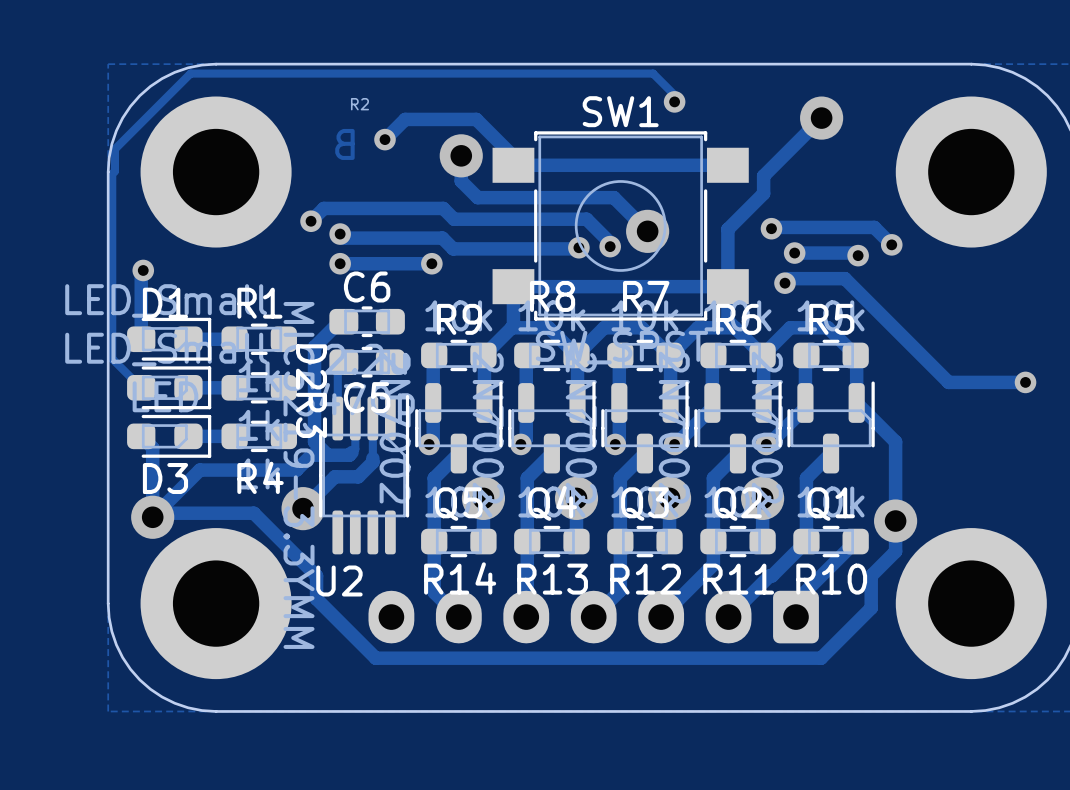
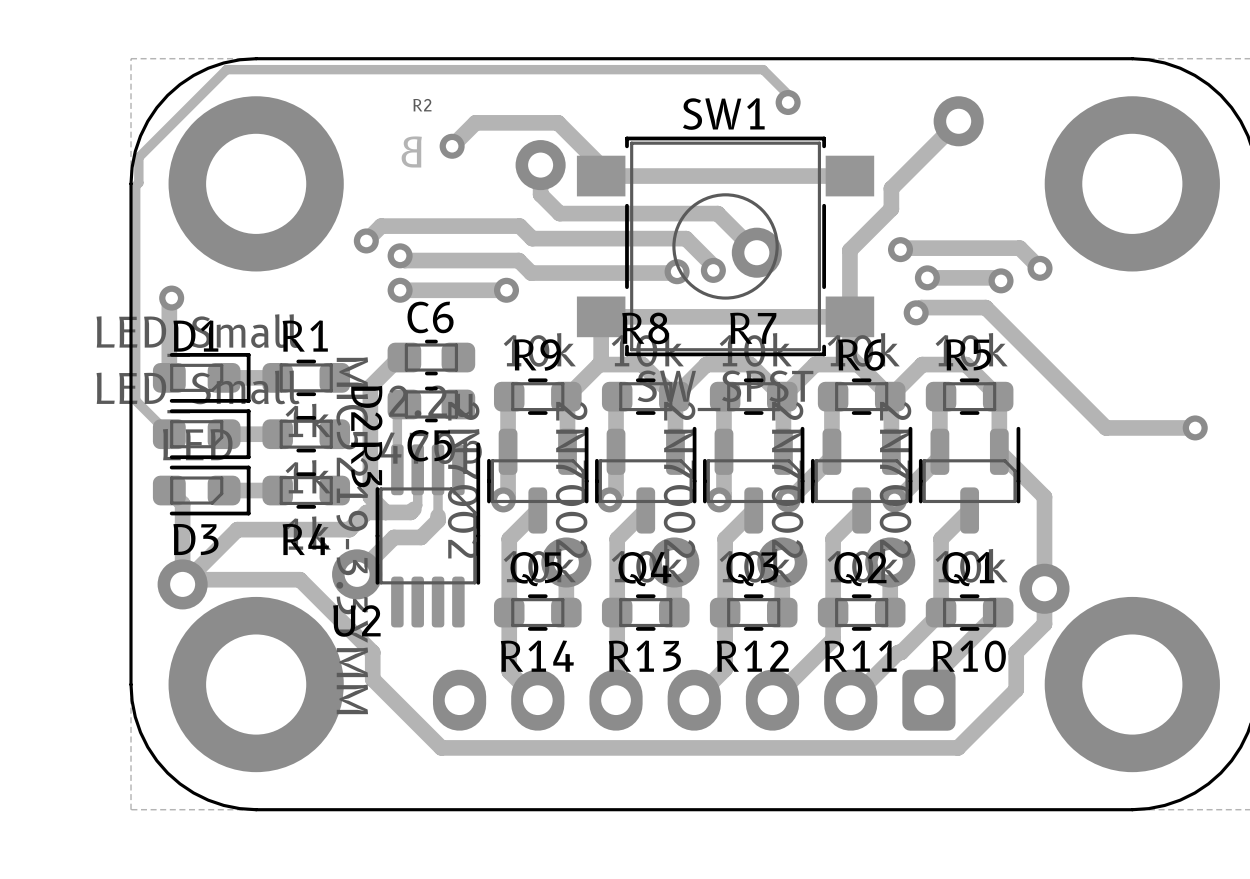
U2 name position: U2 (339, 581) -> U2 (356, 620)

